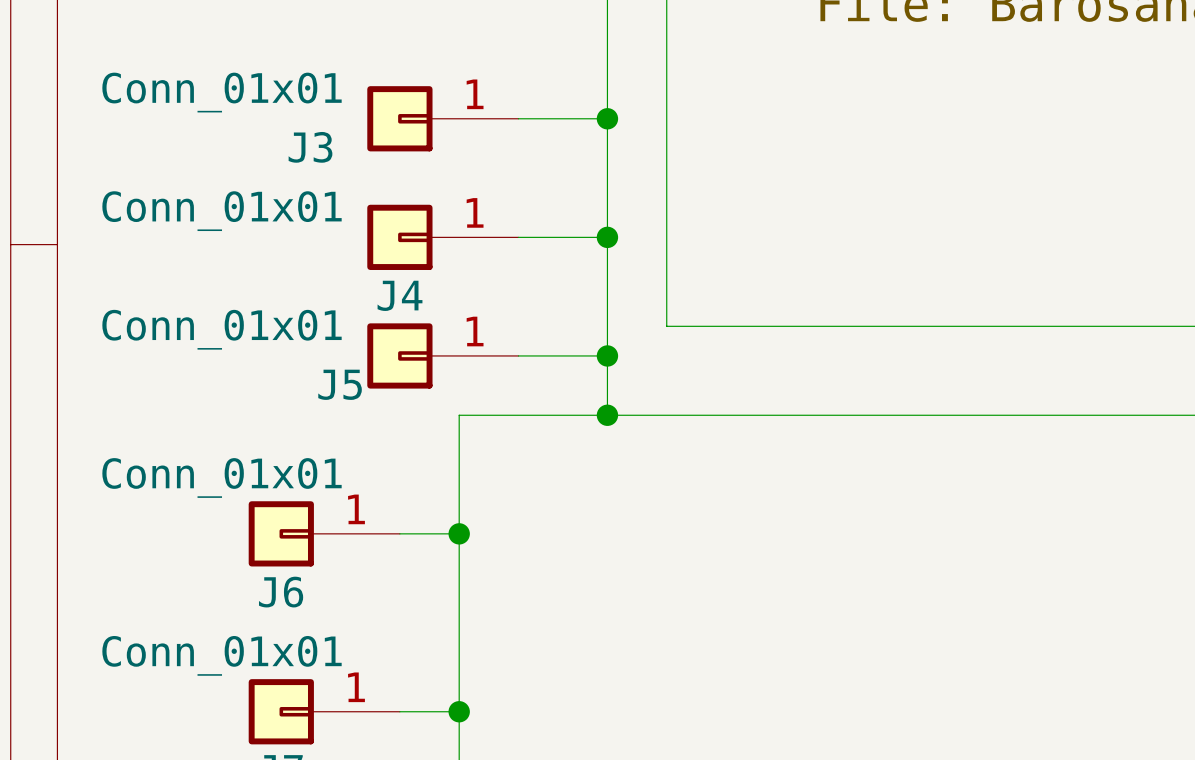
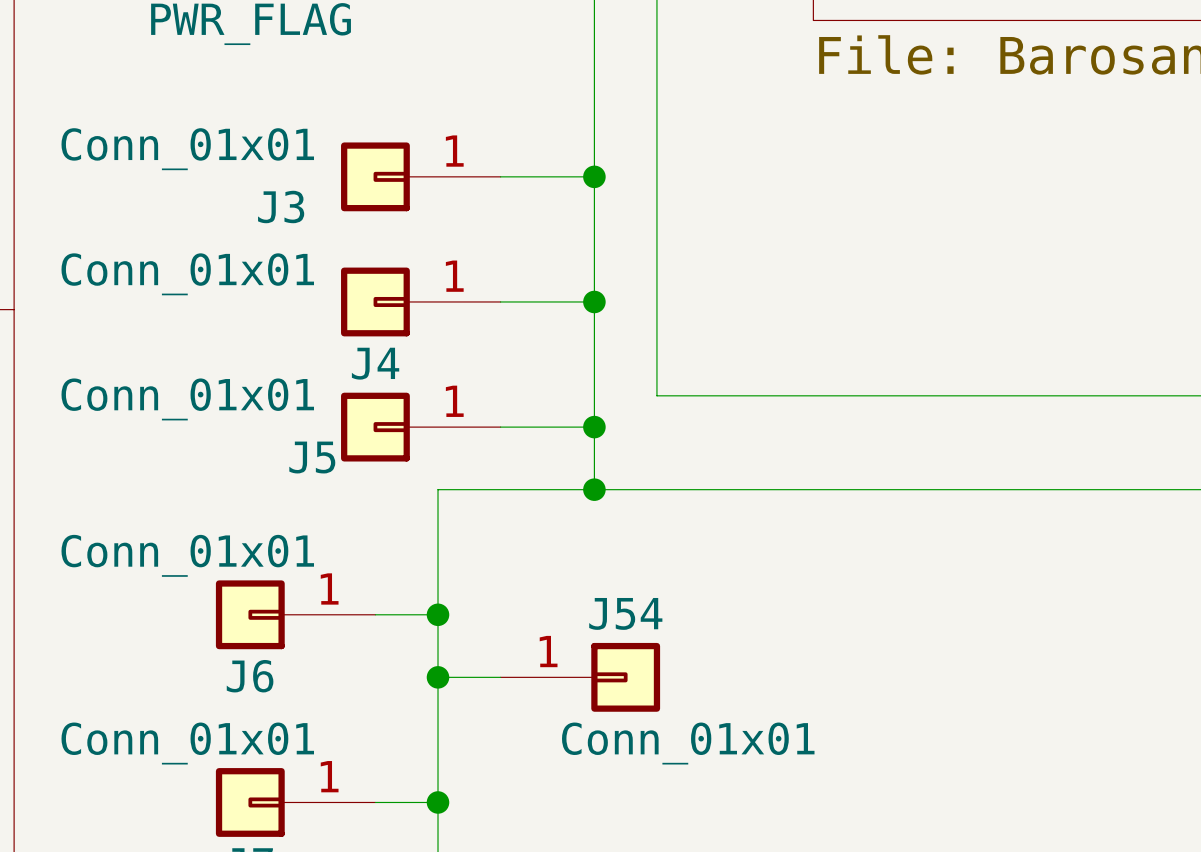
wire: none -> (438, 677) (500, 677)
junction: none -> (438, 677)
J54: none -> Conn_01x01 (580, 677)

